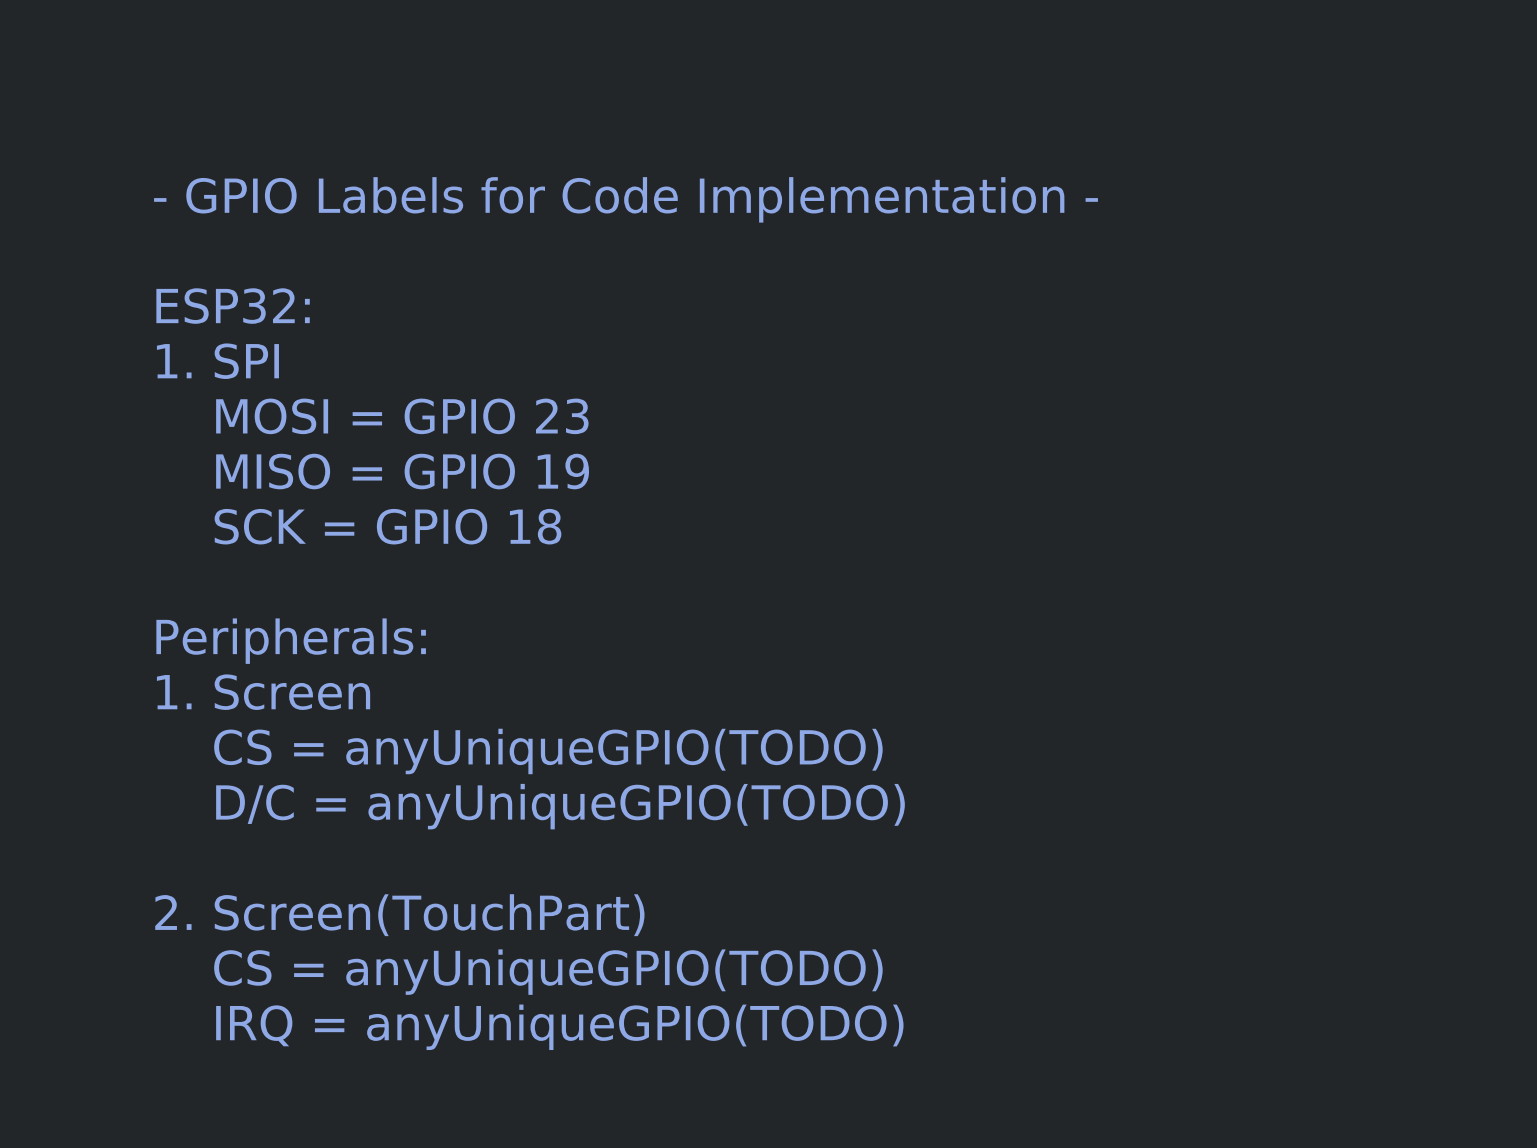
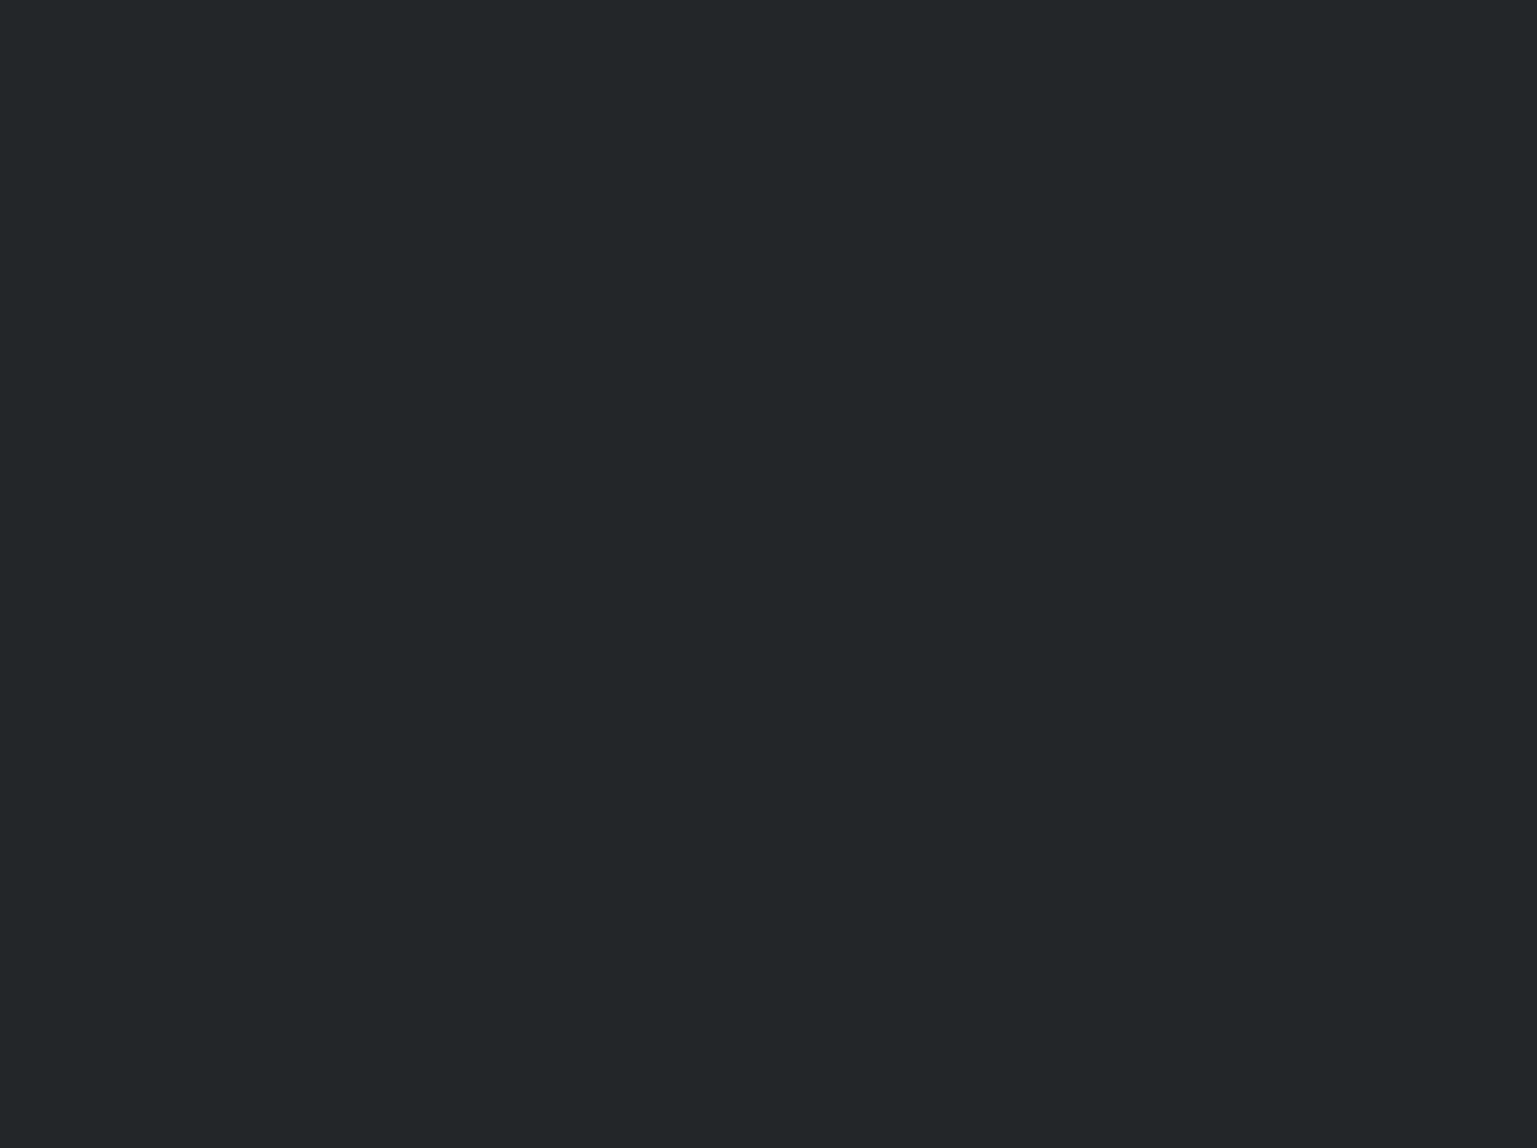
text: - GPIO Labels for Code Implementation - (626, 199) -> none
text: ESP32: (233, 306) -> none
text: 1. SPI (217, 361) -> none
text: MOSI = GPIO 23 (402, 416) -> none
text: MISO = GPIO 19 (402, 471) -> none
text: SCK = GPIO 18 (387, 526) -> none
text: Peripherals: (291, 641) -> none
text: 1. Screen (263, 692) -> none
text: CS = anyUniqueGPIO(TODO) (548, 751) -> none
text: D/C = anyUniqueGPIO(TODO) (560, 806) -> none
text: 2. Screen(TouchPart) (399, 915) -> none
text: CS = anyUniqueGPIO(TODO) (548, 972) -> none
text: IRQ = anyUniqueGPIO(TODO) (559, 1027) -> none

